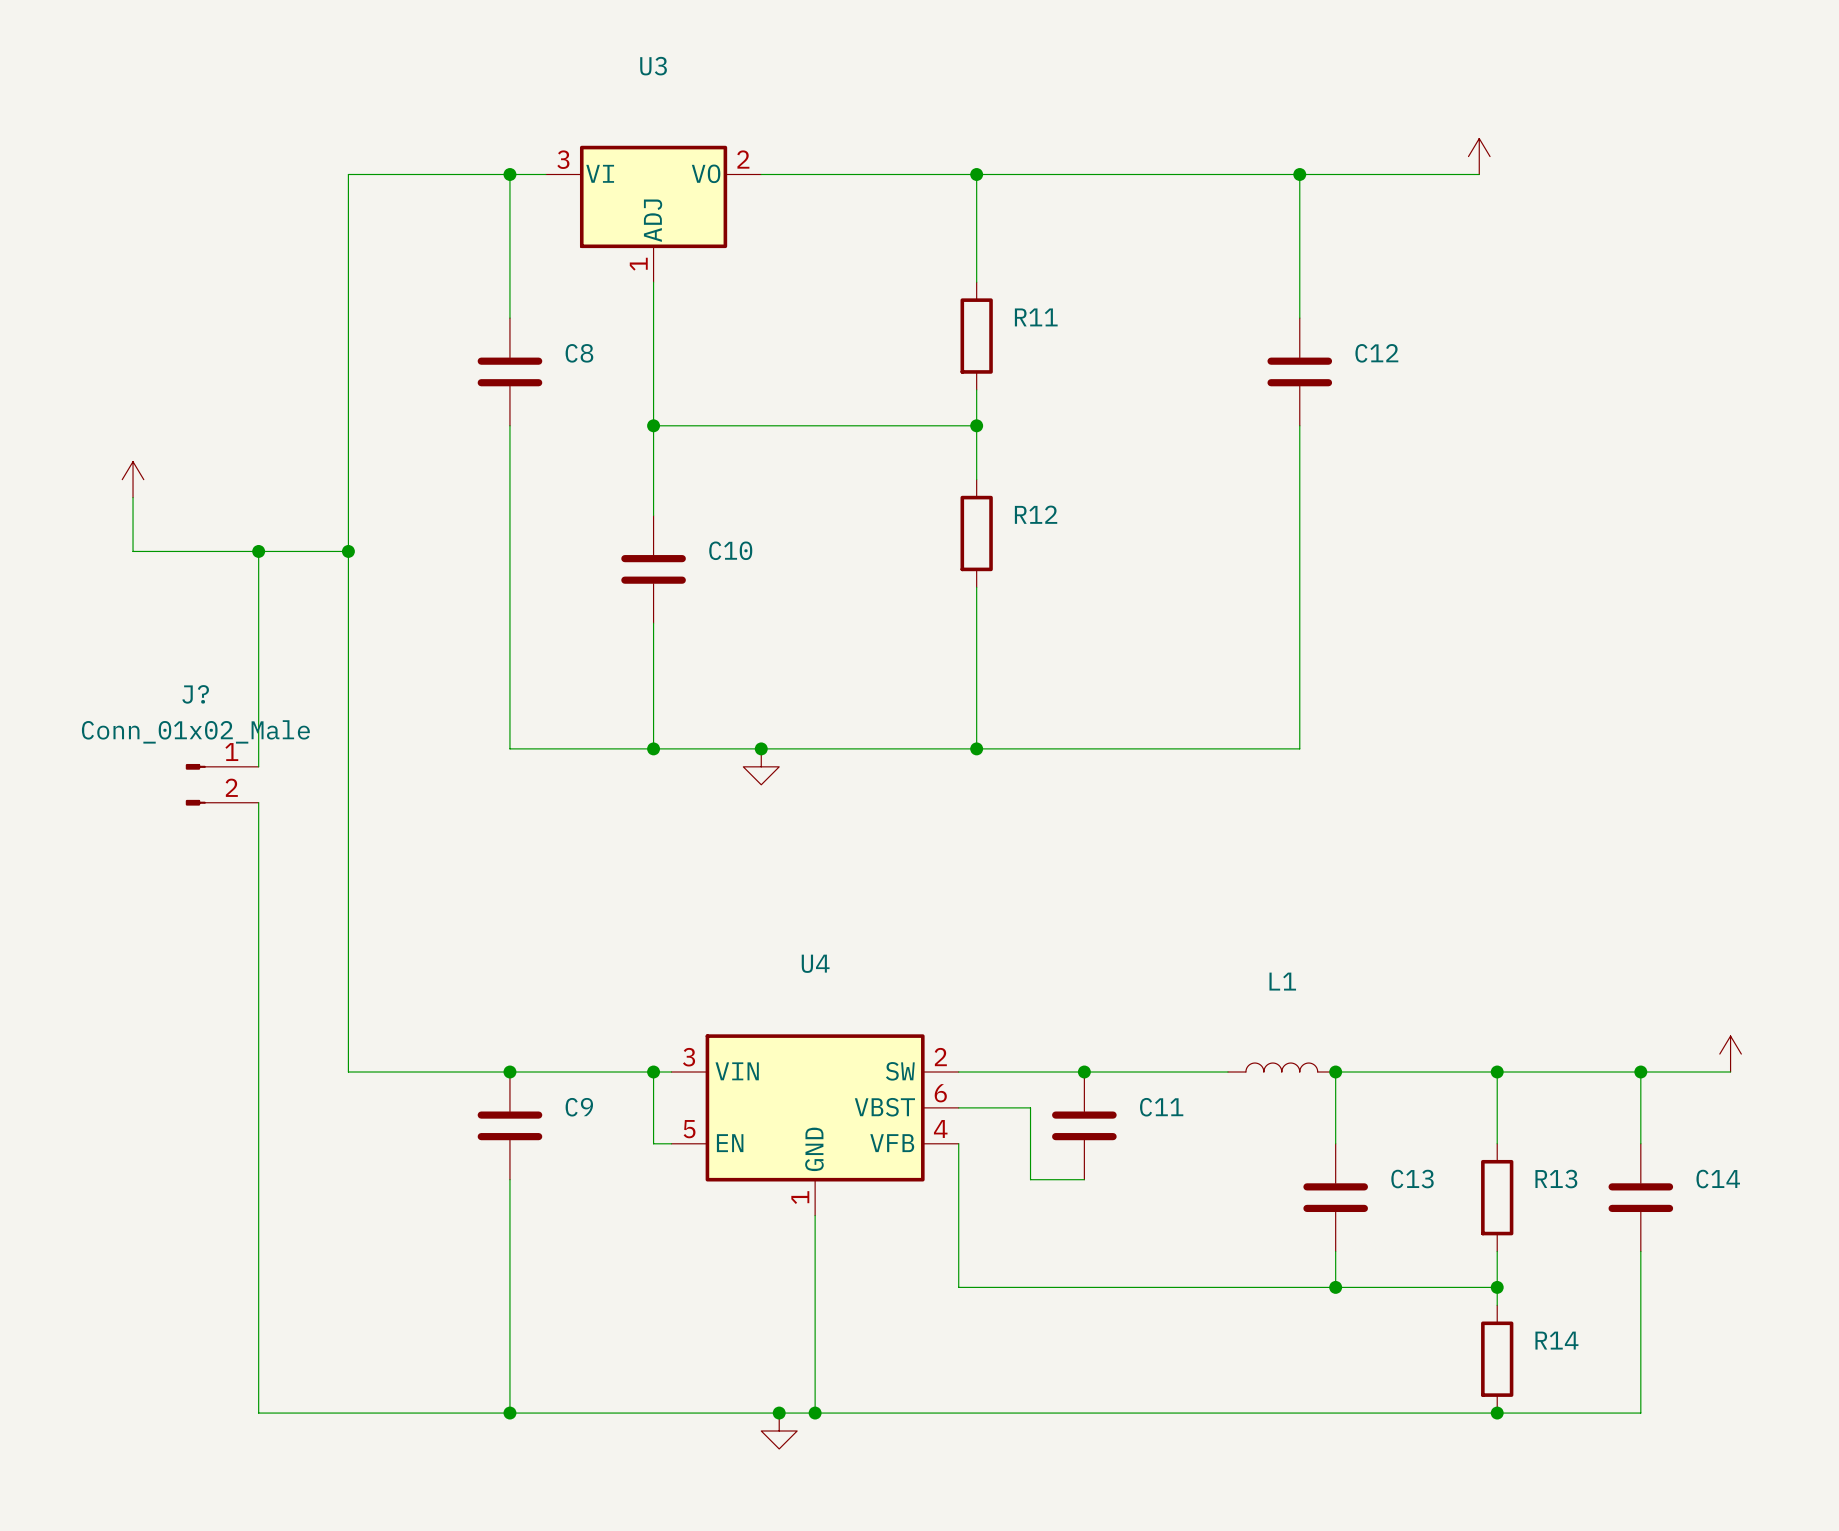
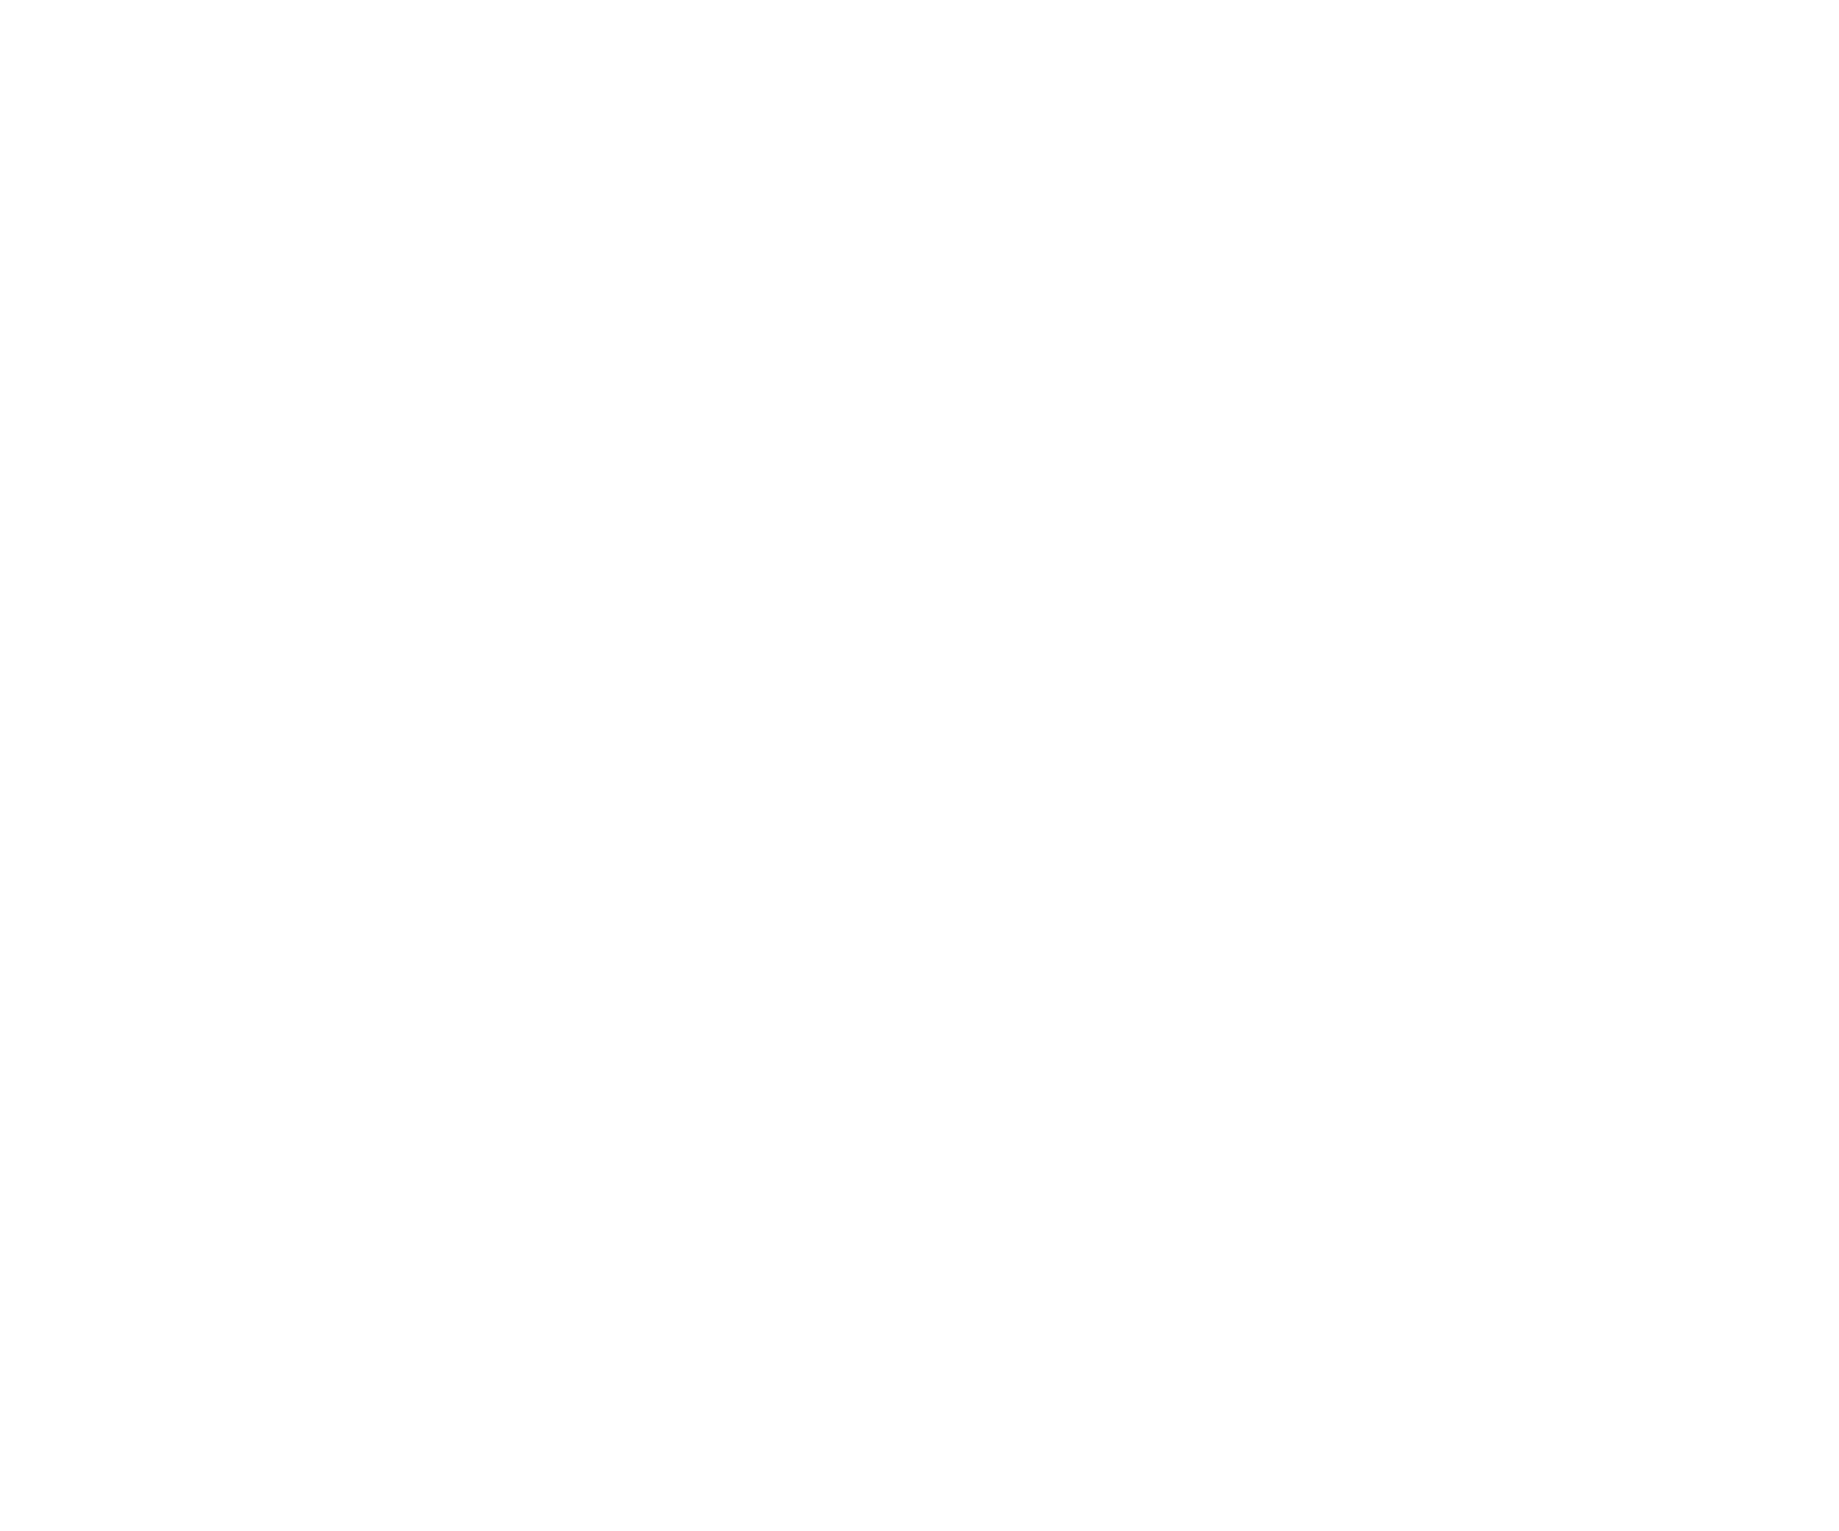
power symbol: (1479, 156) -> none
wire: (509, 174) (509, 318) -> none
junction: (509, 174) -> none
wire: (545, 174) (348, 174) (348, 1072) (671, 1072) -> none
wire: (761, 174) (1479, 174) -> none
wire: (976, 174) (976, 282) -> none
junction: (976, 174) -> none
wire: (1299, 174) (1299, 318) -> none
junction: (1299, 174) -> none
U3: (653, 213) -> none
wire: (653, 282) (653, 515) -> none
R11: (976, 336) -> none
C8: (509, 371) -> none
C12: (1299, 371) -> none
wire: (976, 389) (976, 479) -> none
wire: (509, 425) (509, 748) (1299, 748) (1299, 425) -> none
wire: (653, 425) (976, 425) -> none
junction: (653, 425) -> none
junction: (976, 425) -> none
power symbol: (133, 479) -> none
wire: (133, 497) (133, 551) (348, 551) -> none
R12: (976, 533) -> none
wire: (258, 551) (258, 766) -> none
junction: (258, 551) -> none
junction: (348, 551) -> none
C10: (653, 569) -> none
wire: (976, 587) (976, 748) -> none
wire: (653, 623) (653, 748) -> none
junction: (653, 748) -> none
junction: (761, 748) -> none
junction: (976, 748) -> none
power symbol: (761, 766) -> none
J?: Conn_01x02_Male (222, 784) -> none
wire: (258, 802) (258, 1413) (1640, 1413) (1640, 1251) -> none
power symbol: (1730, 1054) -> none
L1: (1281, 1067) -> none
junction: (509, 1072) -> none
wire: (653, 1072) (653, 1143) (671, 1143) -> none
junction: (653, 1072) -> none
wire: (958, 1072) (1227, 1072) -> none
junction: (1084, 1072) -> none
junction: (1335, 1072) -> none
wire: (1497, 1072) (1497, 1143) -> none
junction: (1497, 1072) -> none
wire: (1640, 1072) (1640, 1143) -> none
junction: (1640, 1072) -> none
wire: (1730, 1072) (1335, 1072) (1335, 1143) -> none
wire: (958, 1107) (1030, 1107) (1030, 1179) (1084, 1179) -> none
U4: (815, 1124) -> none
C9: (509, 1125) -> none
C11: (1084, 1125) -> none
wire: (958, 1143) (958, 1287) (1497, 1287) -> none
wire: (509, 1179) (509, 1413) -> none
C13: (1335, 1197) -> none
R13: (1497, 1197) -> none
C14: (1640, 1197) -> none
wire: (815, 1215) (815, 1413) -> none
wire: (1335, 1251) (1335, 1287) -> none
wire: (1497, 1251) (1497, 1305) -> none
junction: (1335, 1287) -> none
junction: (1497, 1287) -> none
R14: (1497, 1359) -> none
junction: (509, 1413) -> none
junction: (779, 1413) -> none
junction: (815, 1413) -> none
junction: (1497, 1413) -> none
power symbol: (779, 1431) -> none

